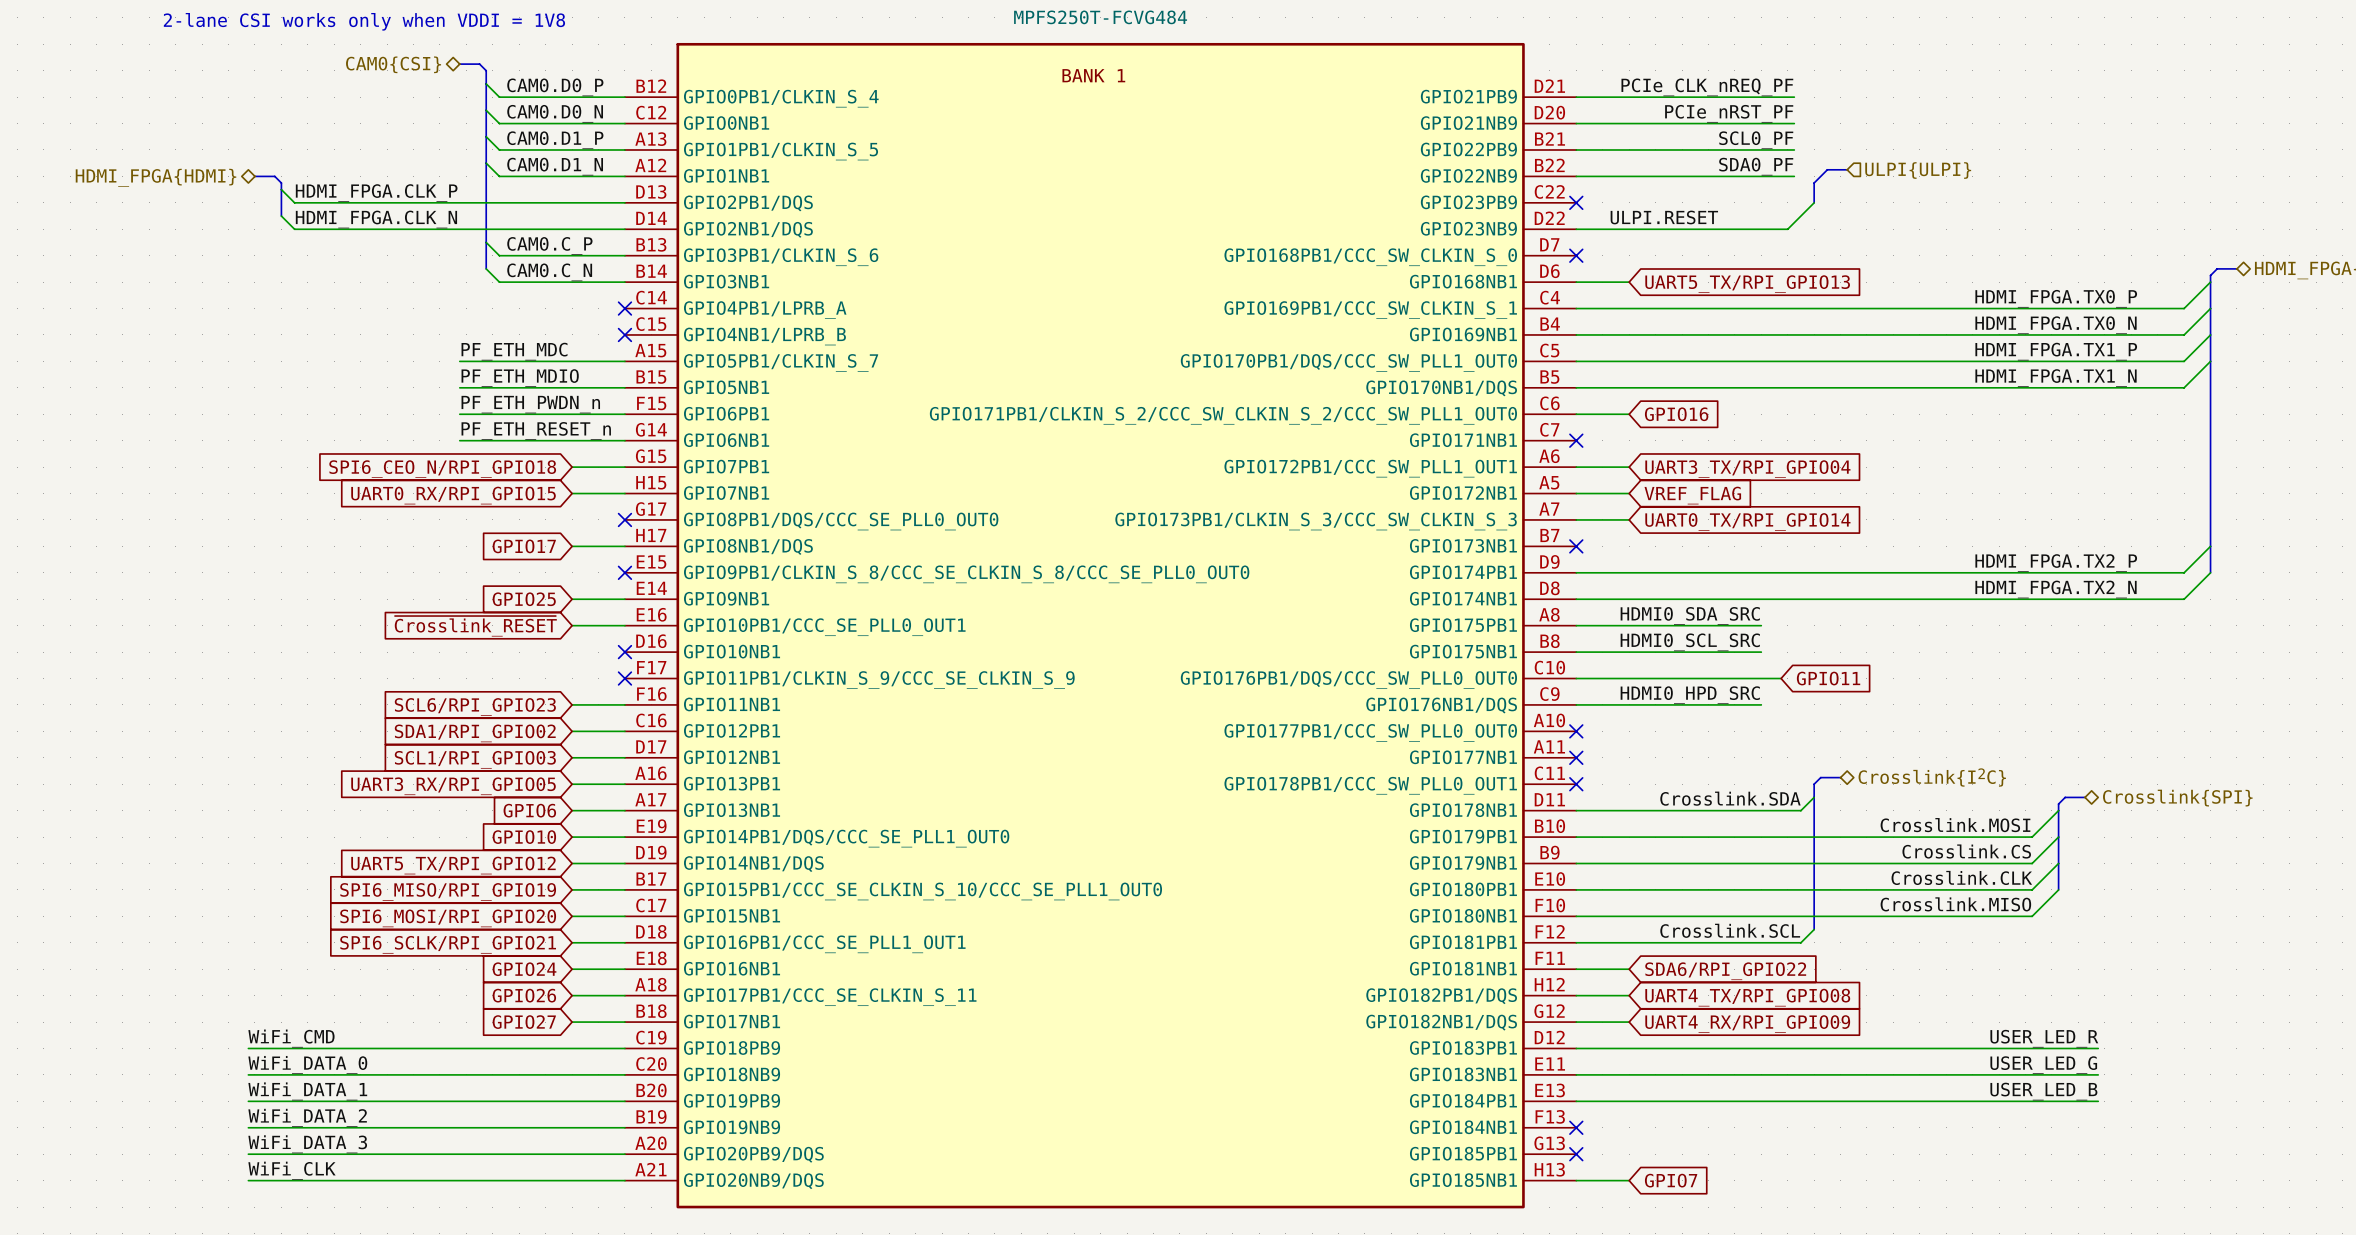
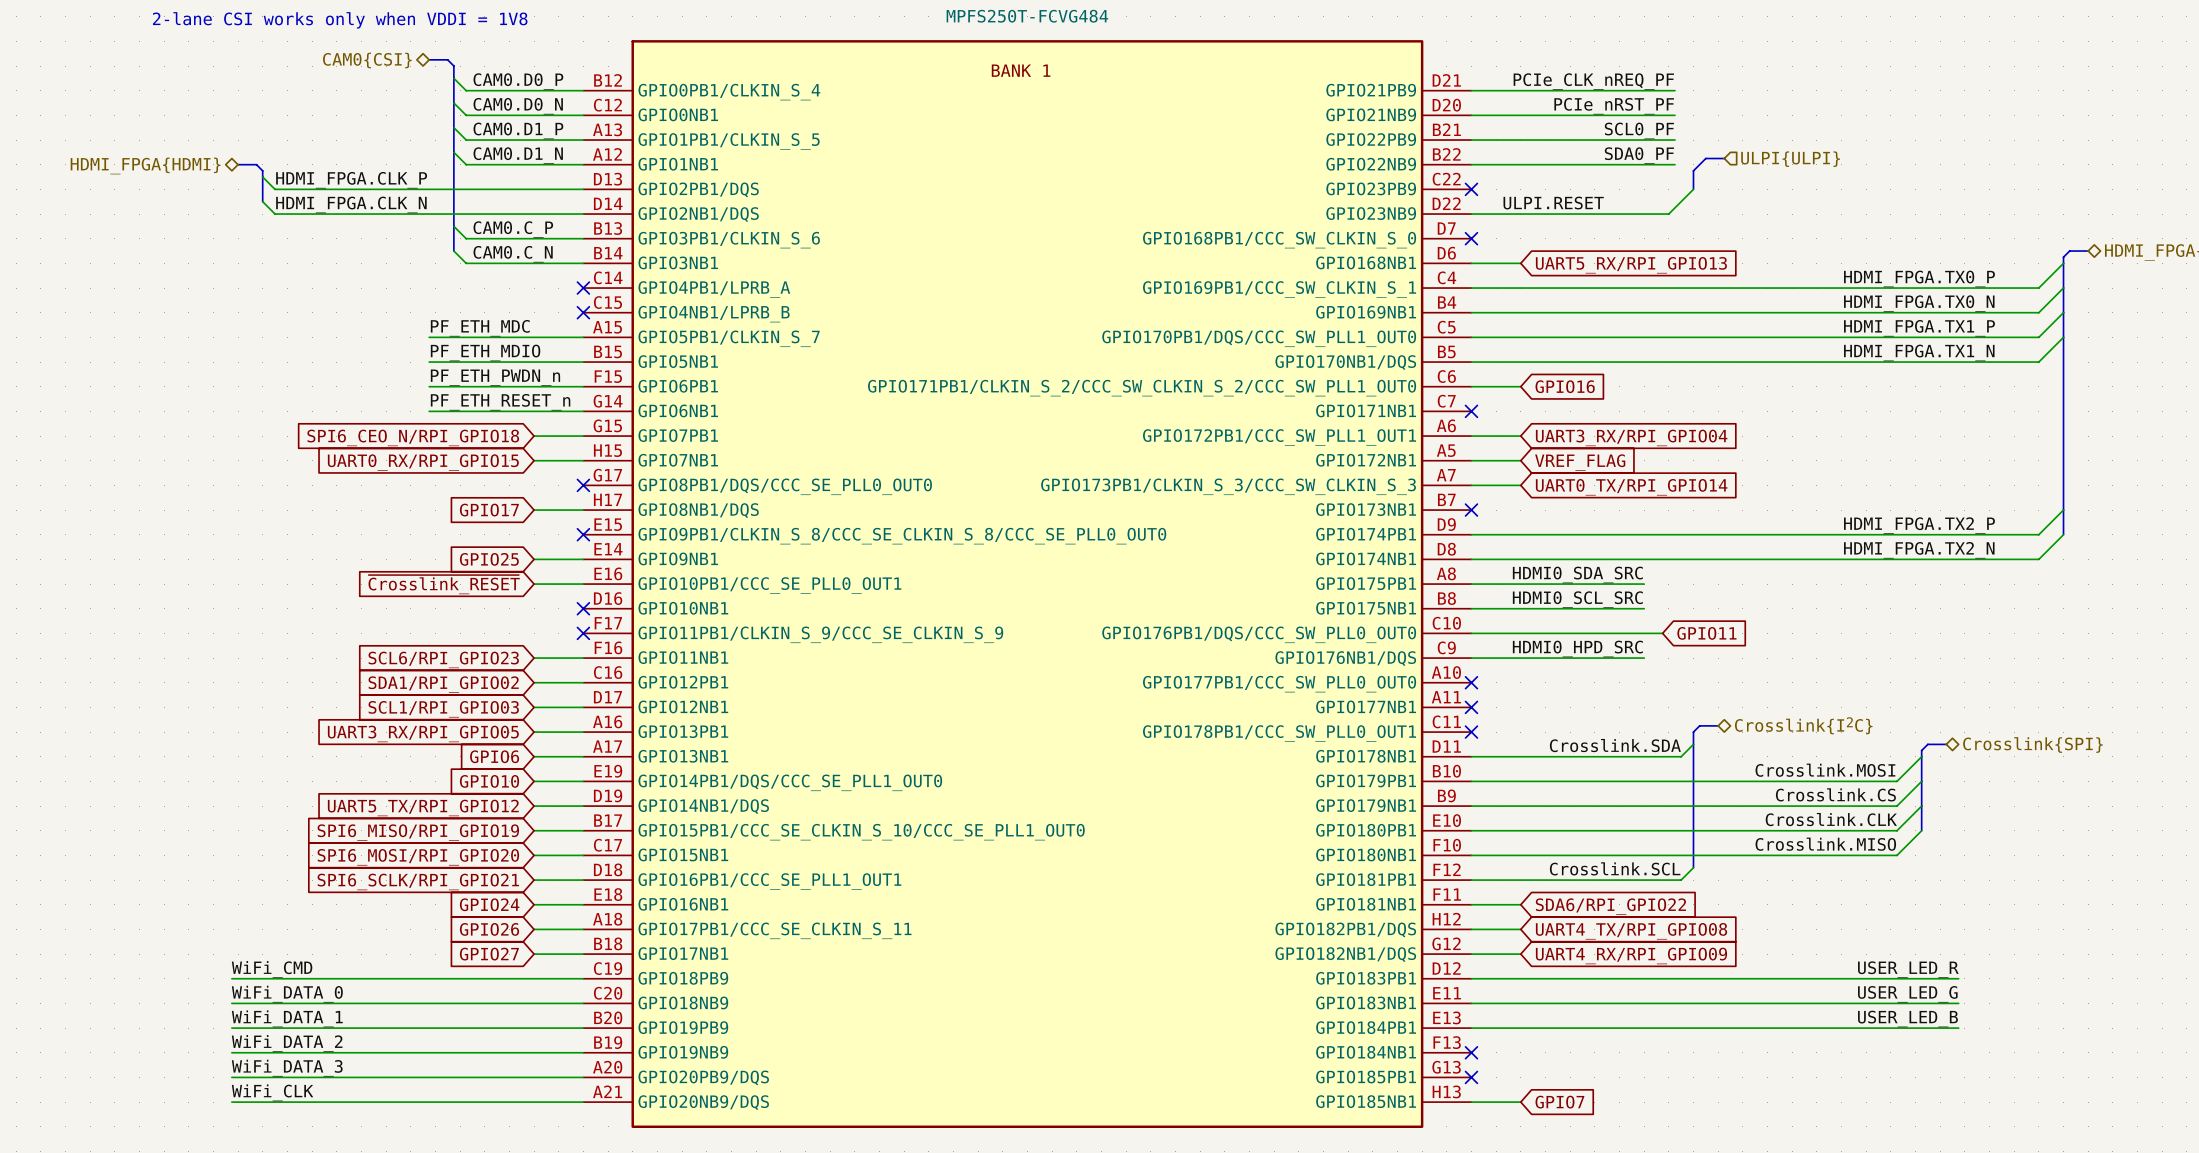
global label: UART5_TX/RPI_GPIO13 (1747, 284) -> UART5_RX/RPI_GPIO13 (1631, 265)
global label: UART3_TX/RPI_GPIO04 (1747, 469) -> UART3_RX/RPI_GPIO04 (1631, 437)

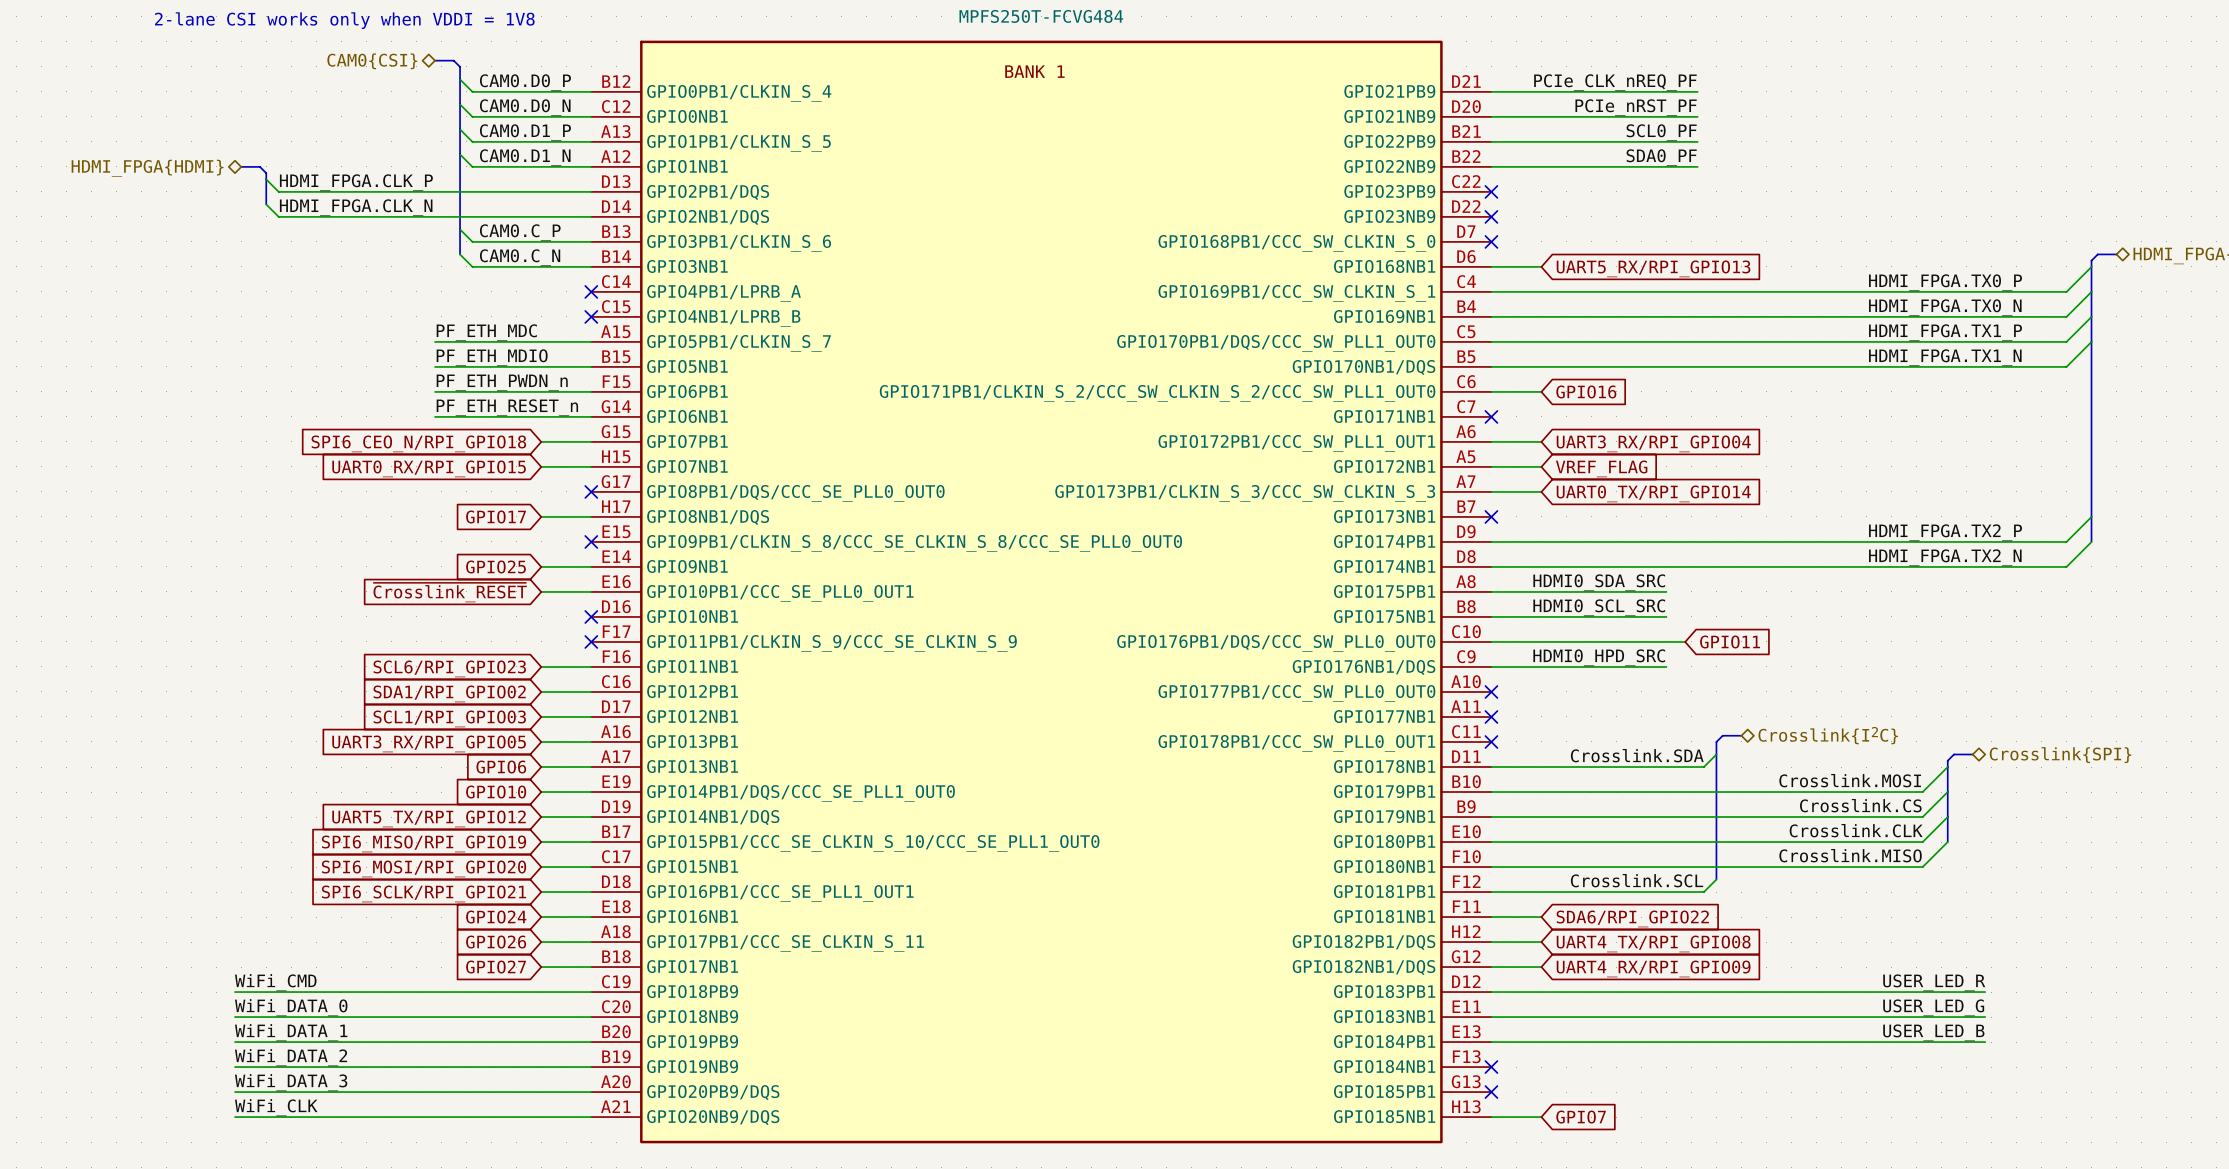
bus: (1724, 158) (1705, 158) (1693, 170) (1693, 189) -> none
hierarchical label: ULPI{ULPI} (1790, 159) -> none
wire: (1693, 189) (1668, 214) (1471, 214) -> none
label: ULPI.RESET (1553, 203) -> none
no-connect mark: none -> (1491, 216)

